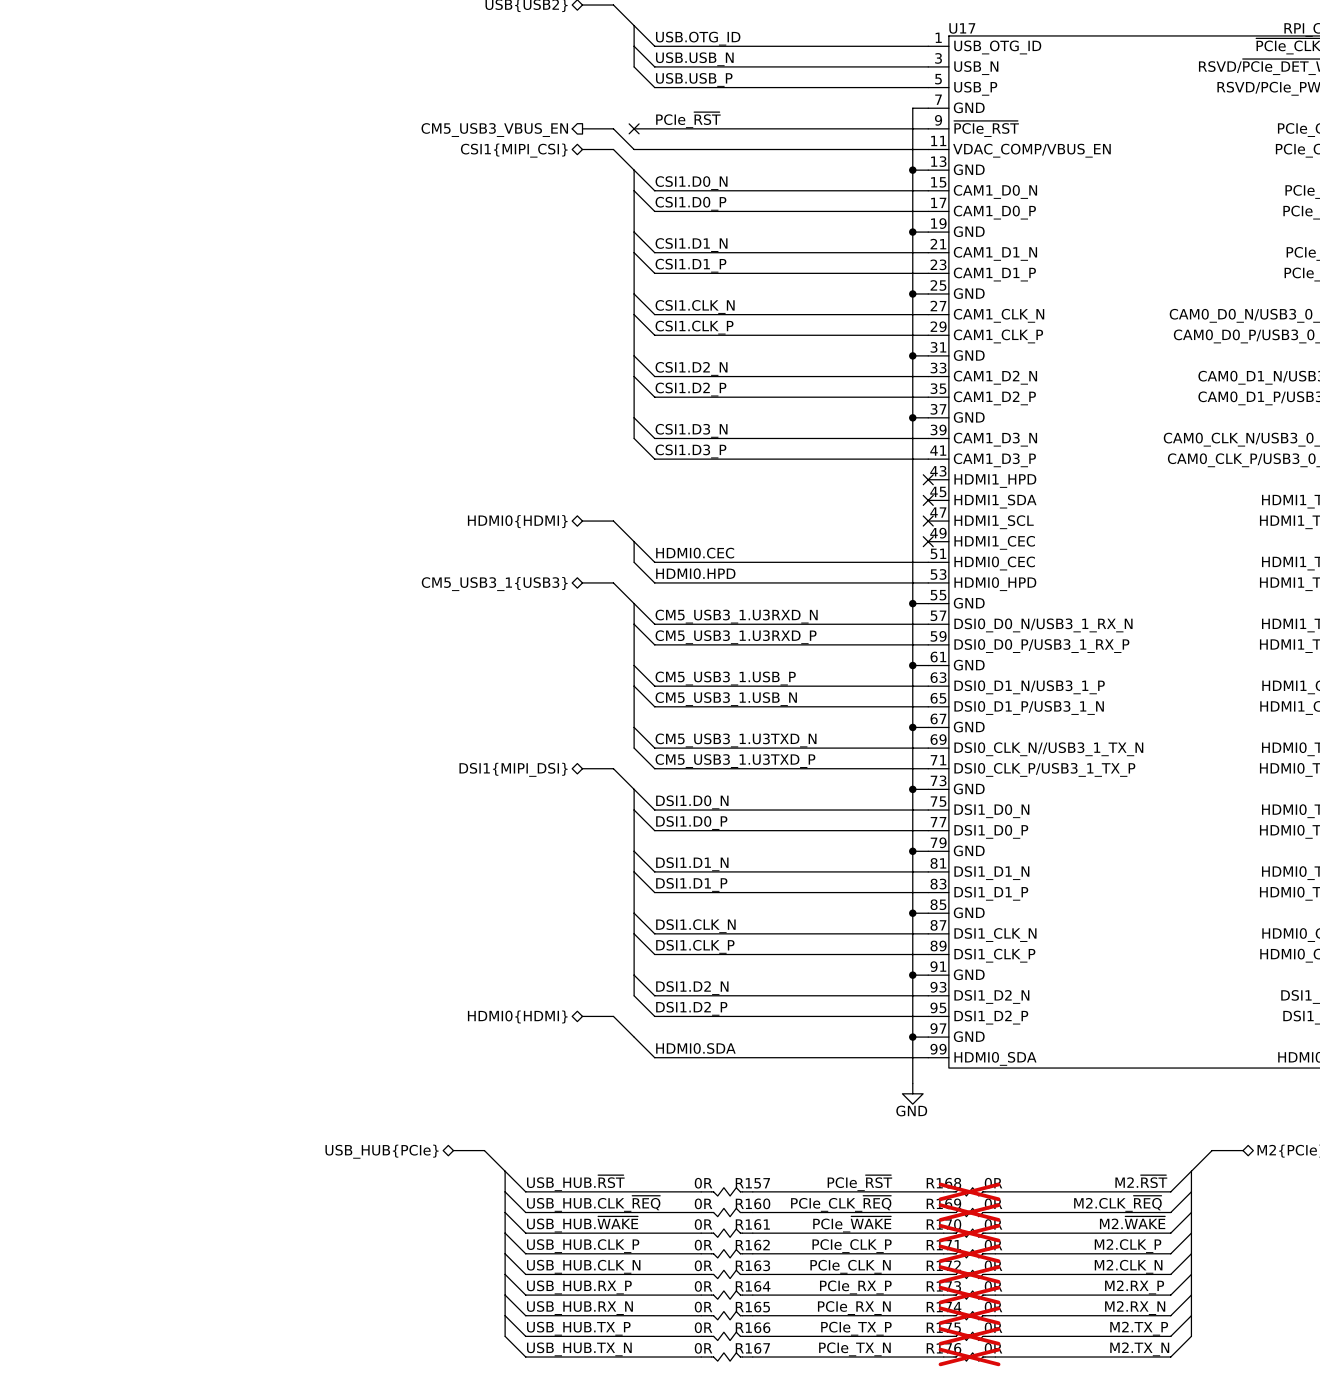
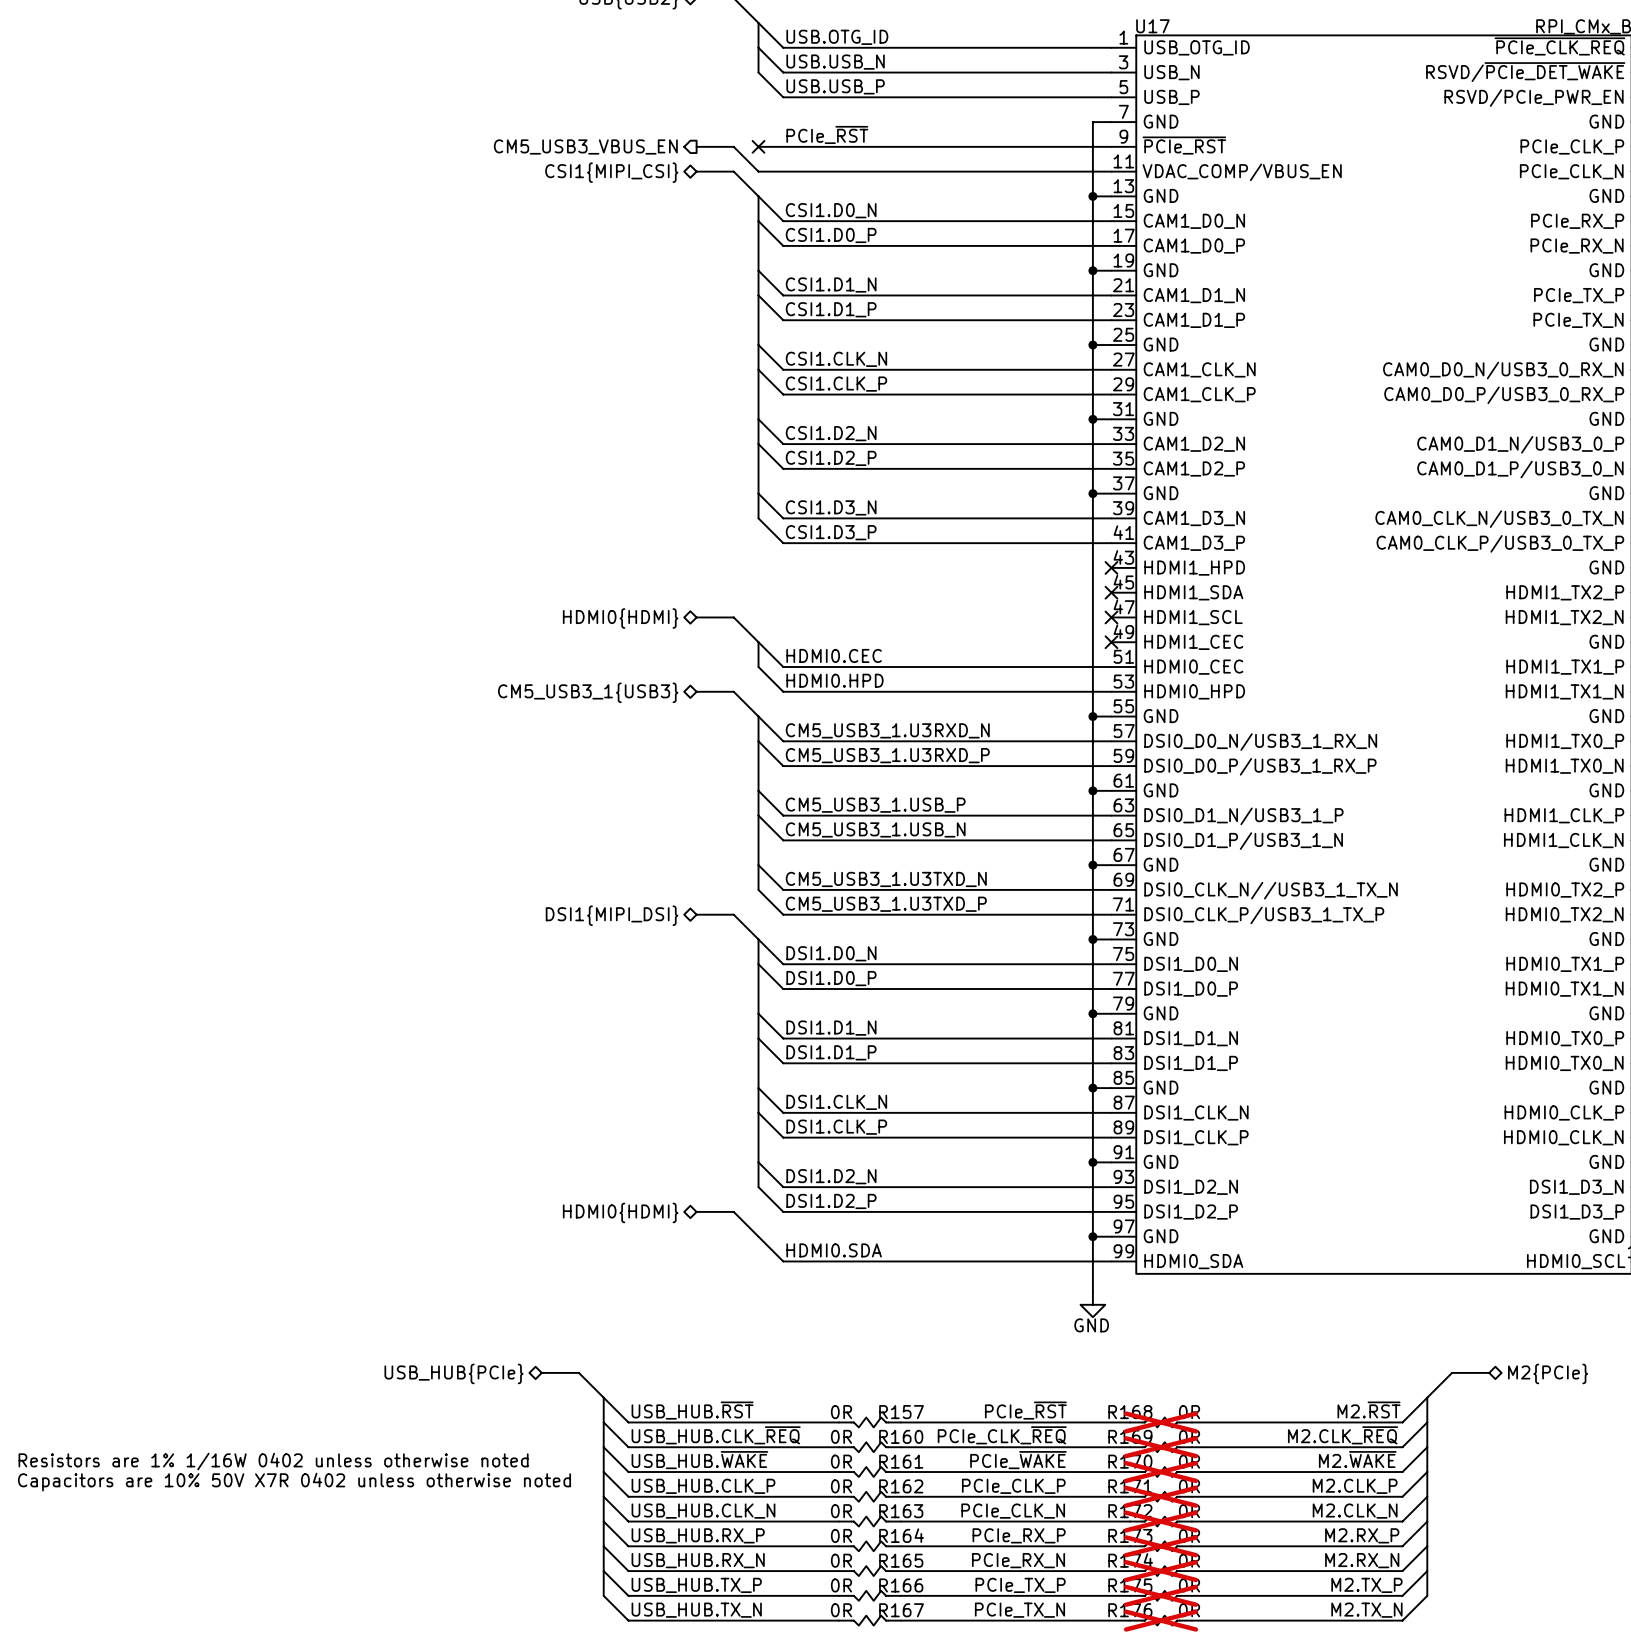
text: none -> Resistors are 1% 1/16W 0402 unless otherwise noted (273, 1461)
text: none -> Capacitors are 10% 50V X7R 0402 unless otherwise noted (294, 1482)

